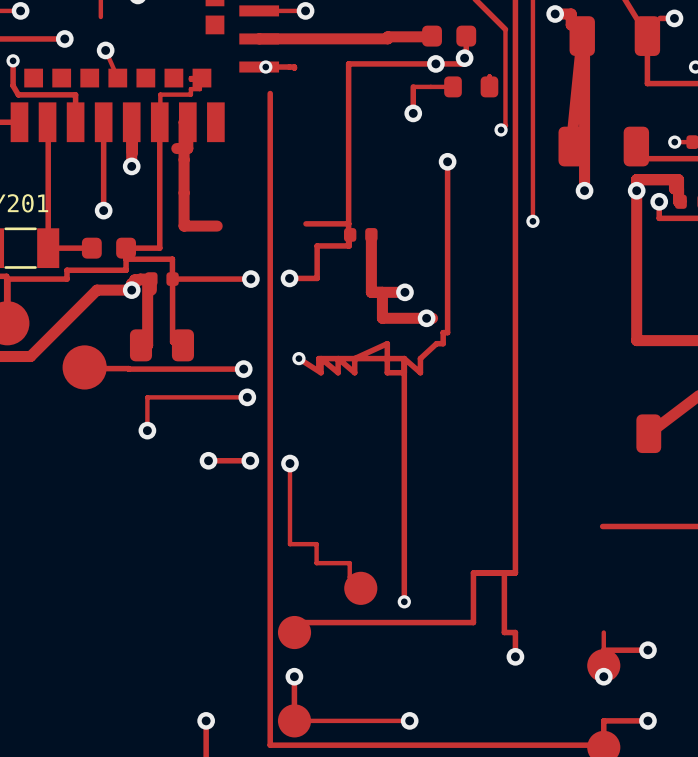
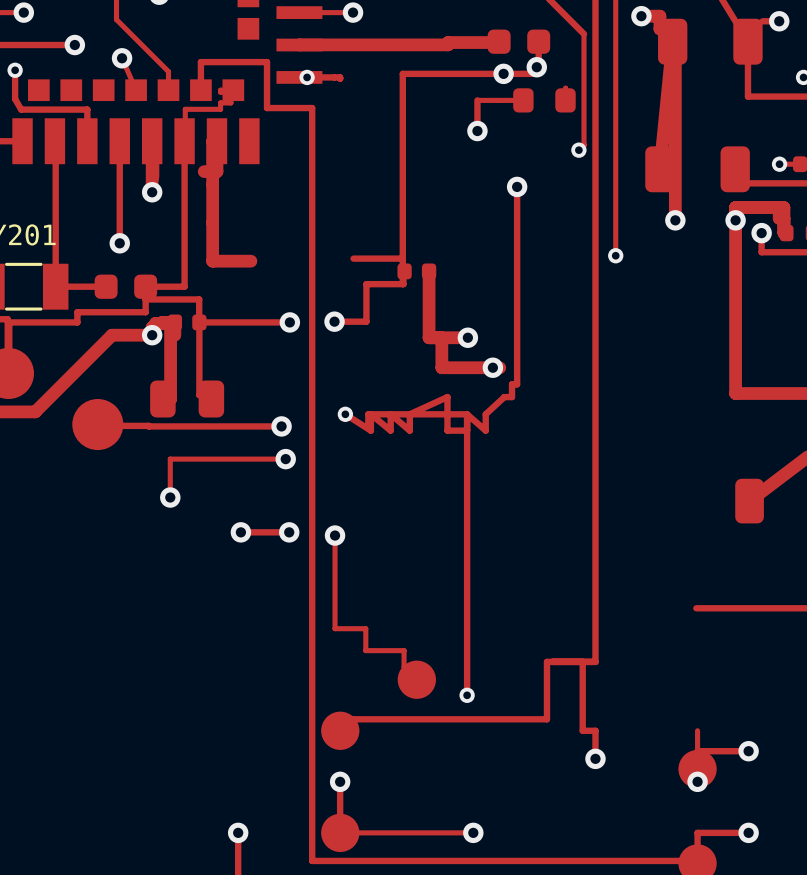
track: none -> (116, 19) (168, 71) (168, 90)
track: none -> (200, 90) (200, 62) (267, 62) (267, 108) (312, 108)

